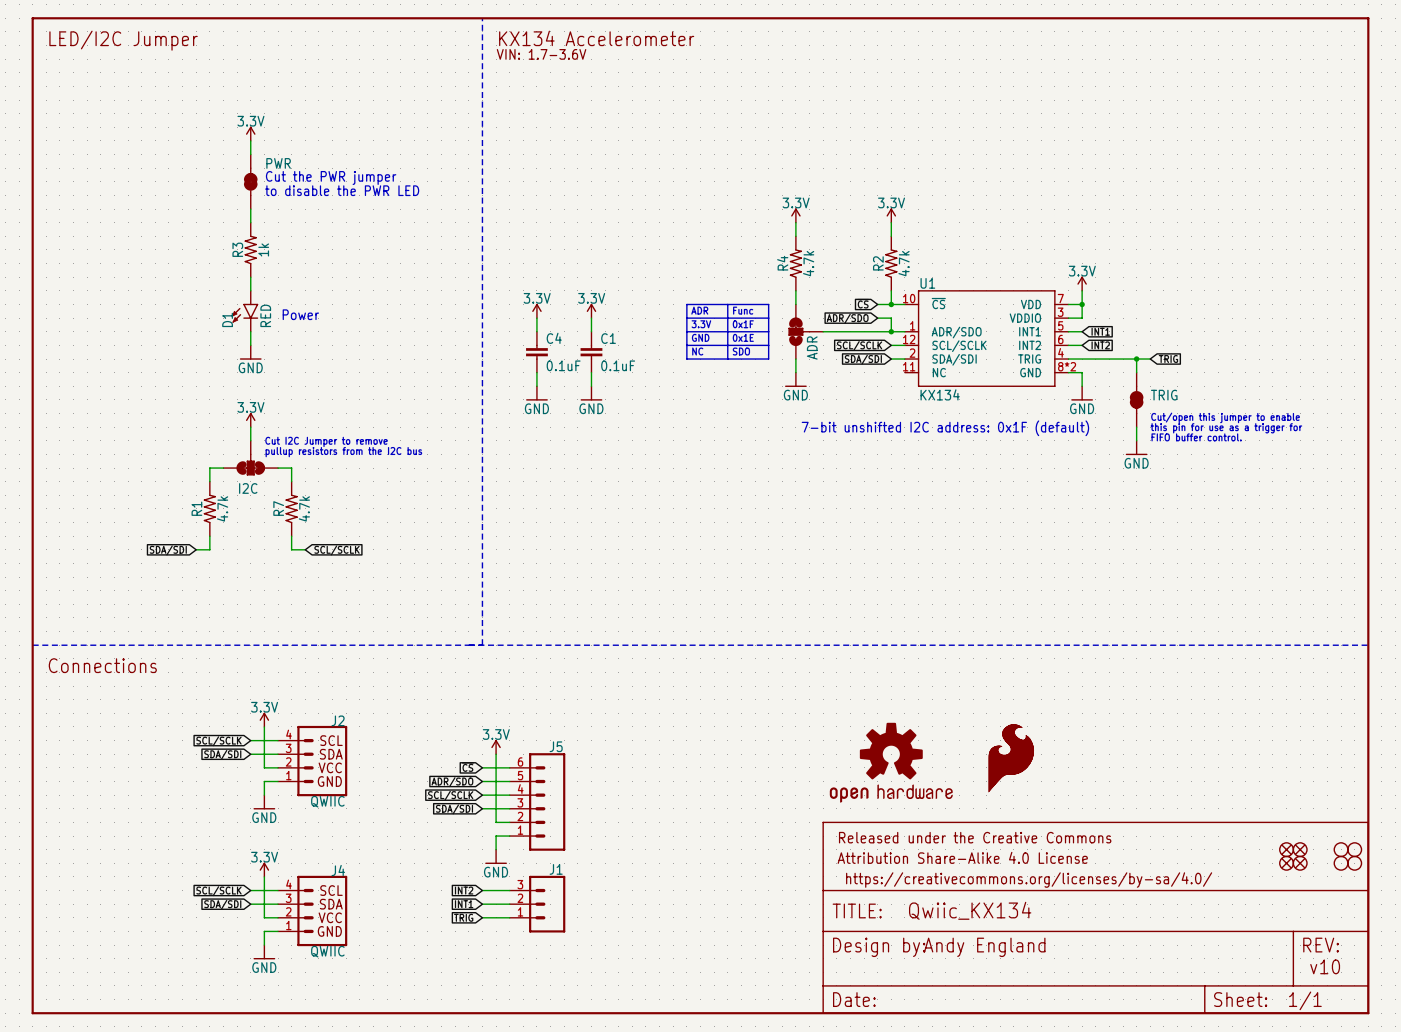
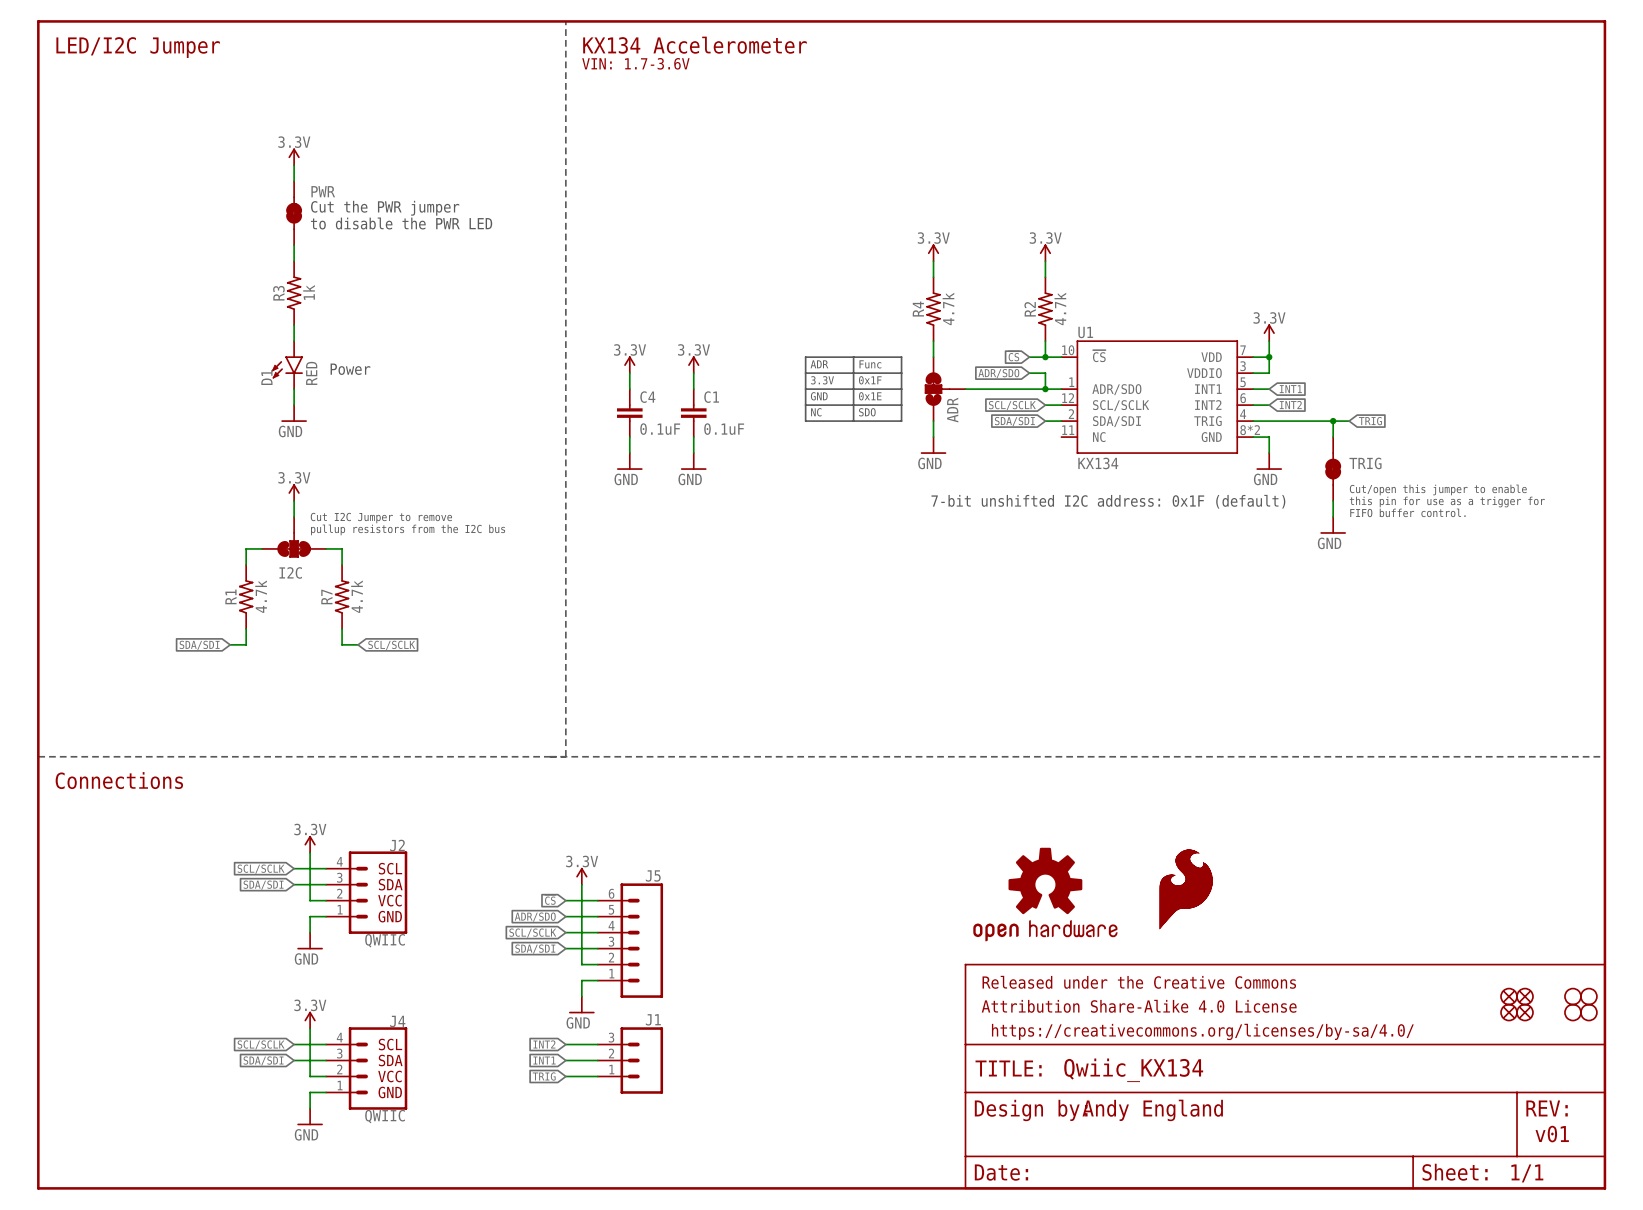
text: v10 (1325, 966) -> v01 (1552, 1134)

